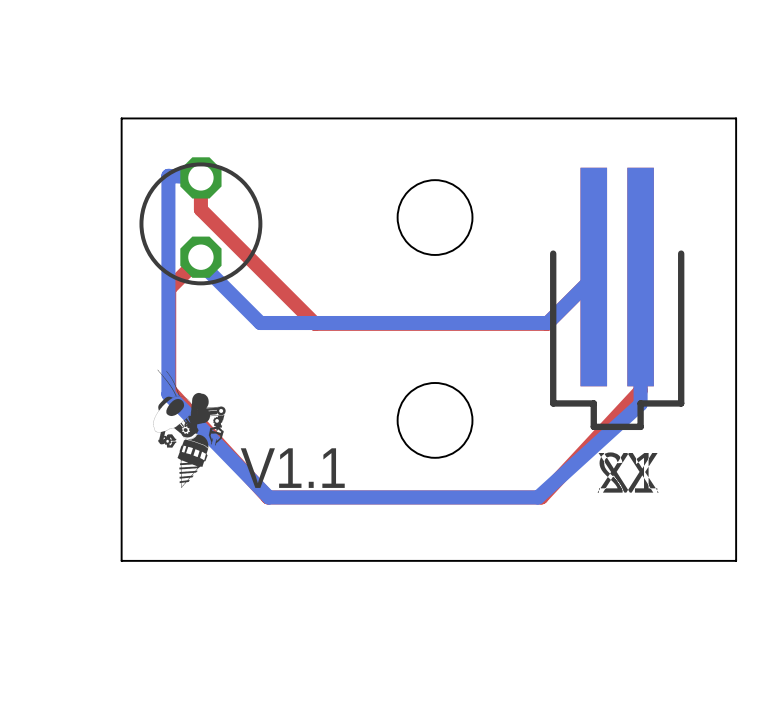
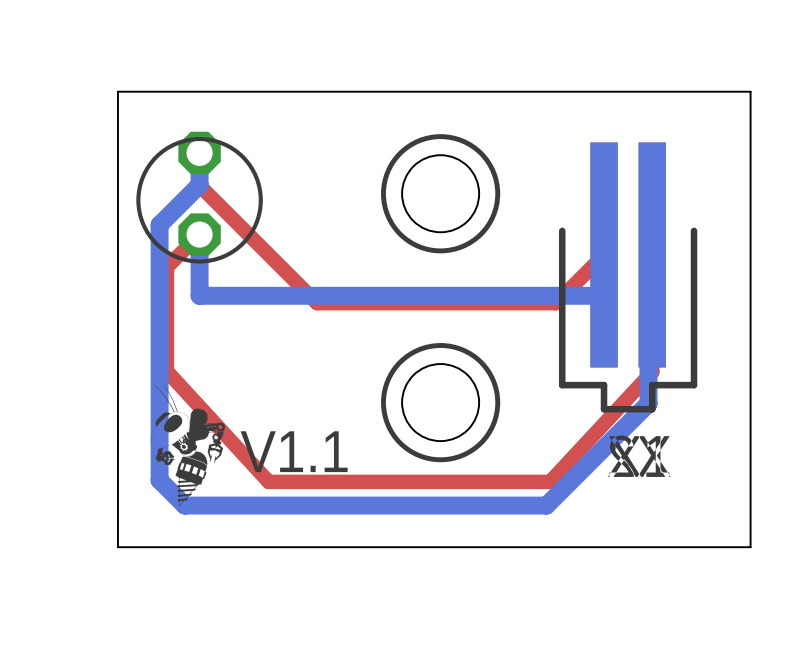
drawing: none -> [381, 134, 501, 254]
bottom track: (200, 177) (168, 175) (168, 394) (268, 497) (538, 497) (640, 404) (640, 277) -> (199, 152) (199, 184) (159, 224) (159, 480) (184, 505) (546, 505) (648, 403) (648, 357)
bottom track: (200, 263) (260, 323) (547, 323) (593, 277) -> (199, 241) (199, 295) (607, 295)
drawing: none -> [381, 343, 501, 463]
drawing position: (189, 428) -> (187, 445)

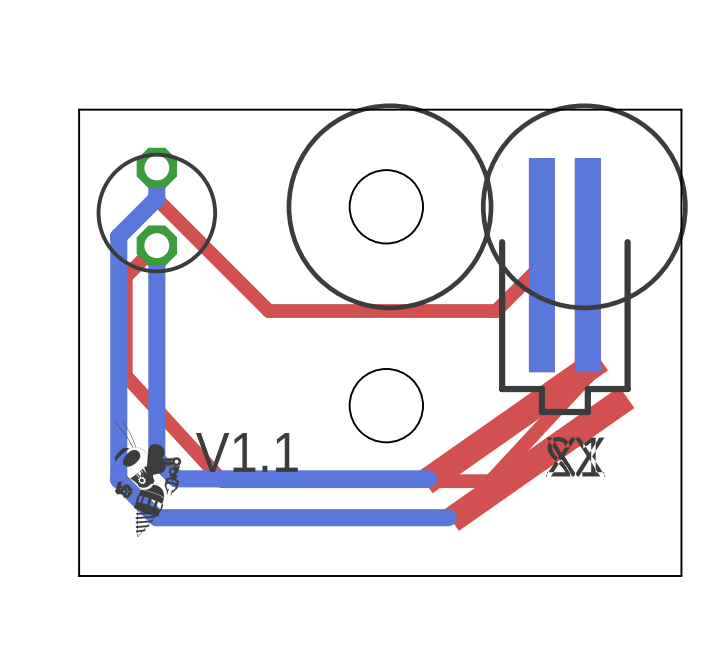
drawing: none -> [480, 103, 688, 311]
drawing shape: [381, 134, 501, 254] -> [286, 103, 494, 311]
bottom track: (607, 295) (199, 295) -> (428, 478) (176, 478) (156, 459) (156, 303)
drawing: [381, 343, 501, 463] -> none
bottom track: (648, 357) (648, 403) (546, 505) (184, 505) -> (448, 517) (156, 517) (142, 503)
part: none -> (526, 439)
drawing position: (187, 445) -> (145, 479)
board edge: (750, 547) (117, 547) -> (681, 543) (681, 575) (79, 575) (79, 543)

